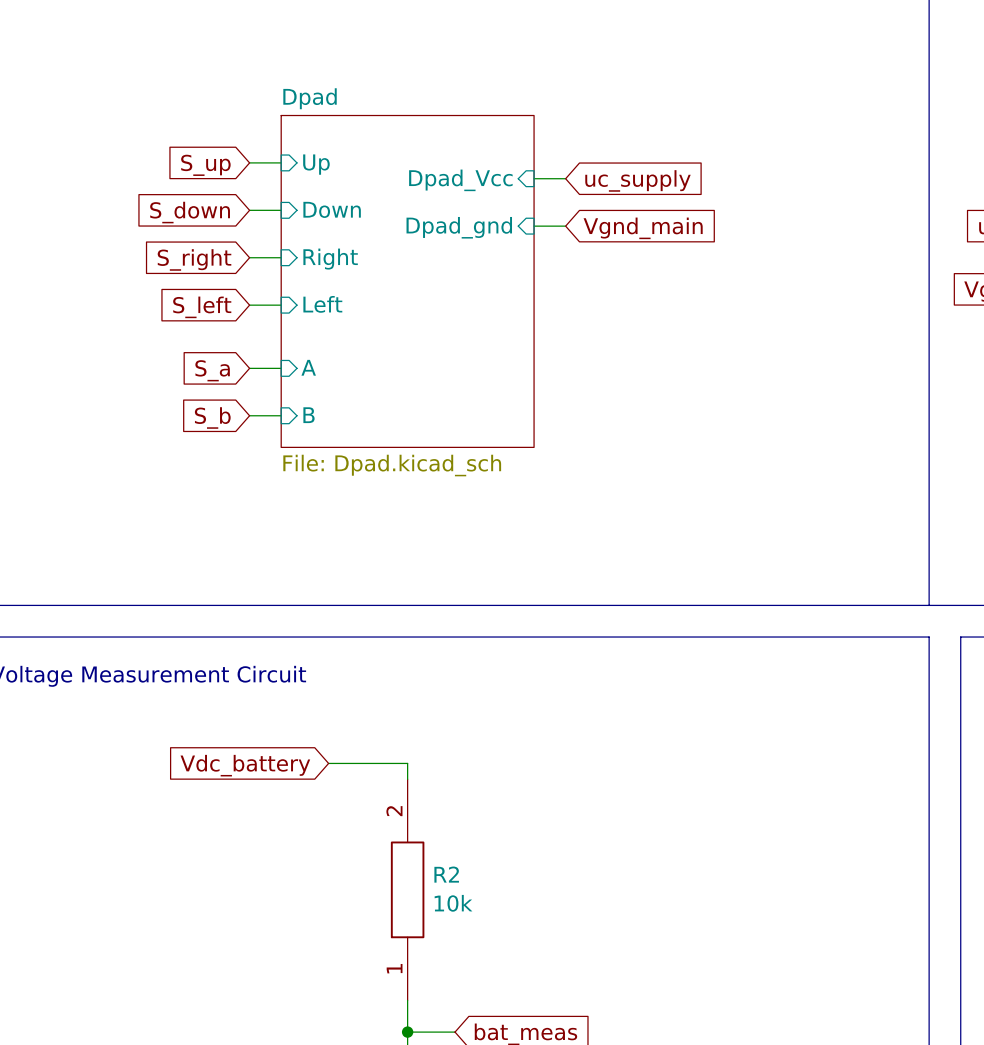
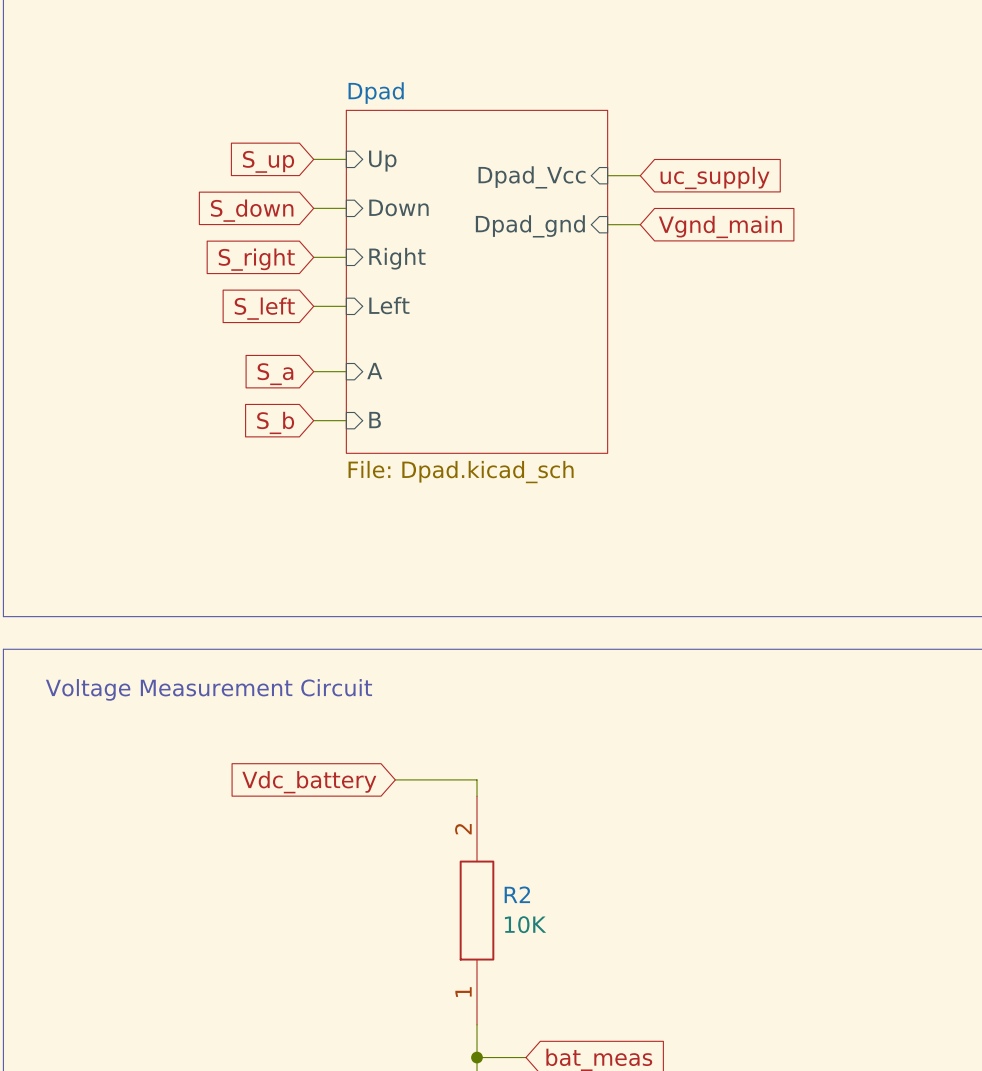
R2 value: 10k (453, 903) -> 10K (525, 924)

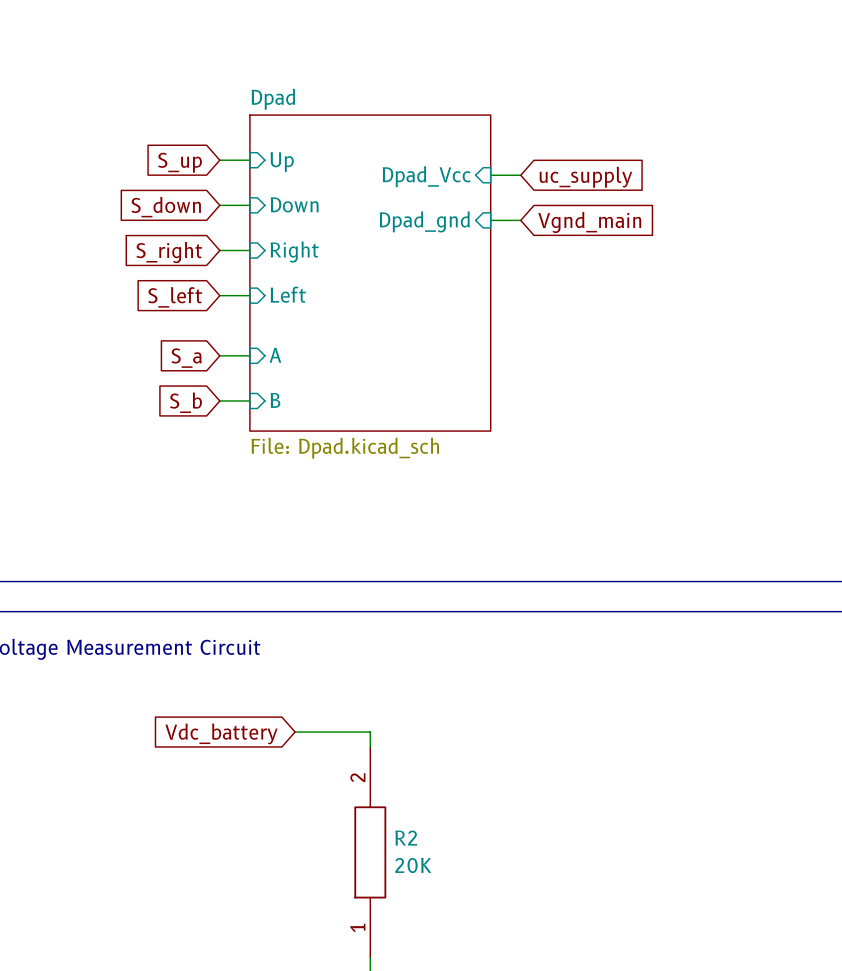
R2 value: 10K (525, 924) -> 20K (413, 865)

